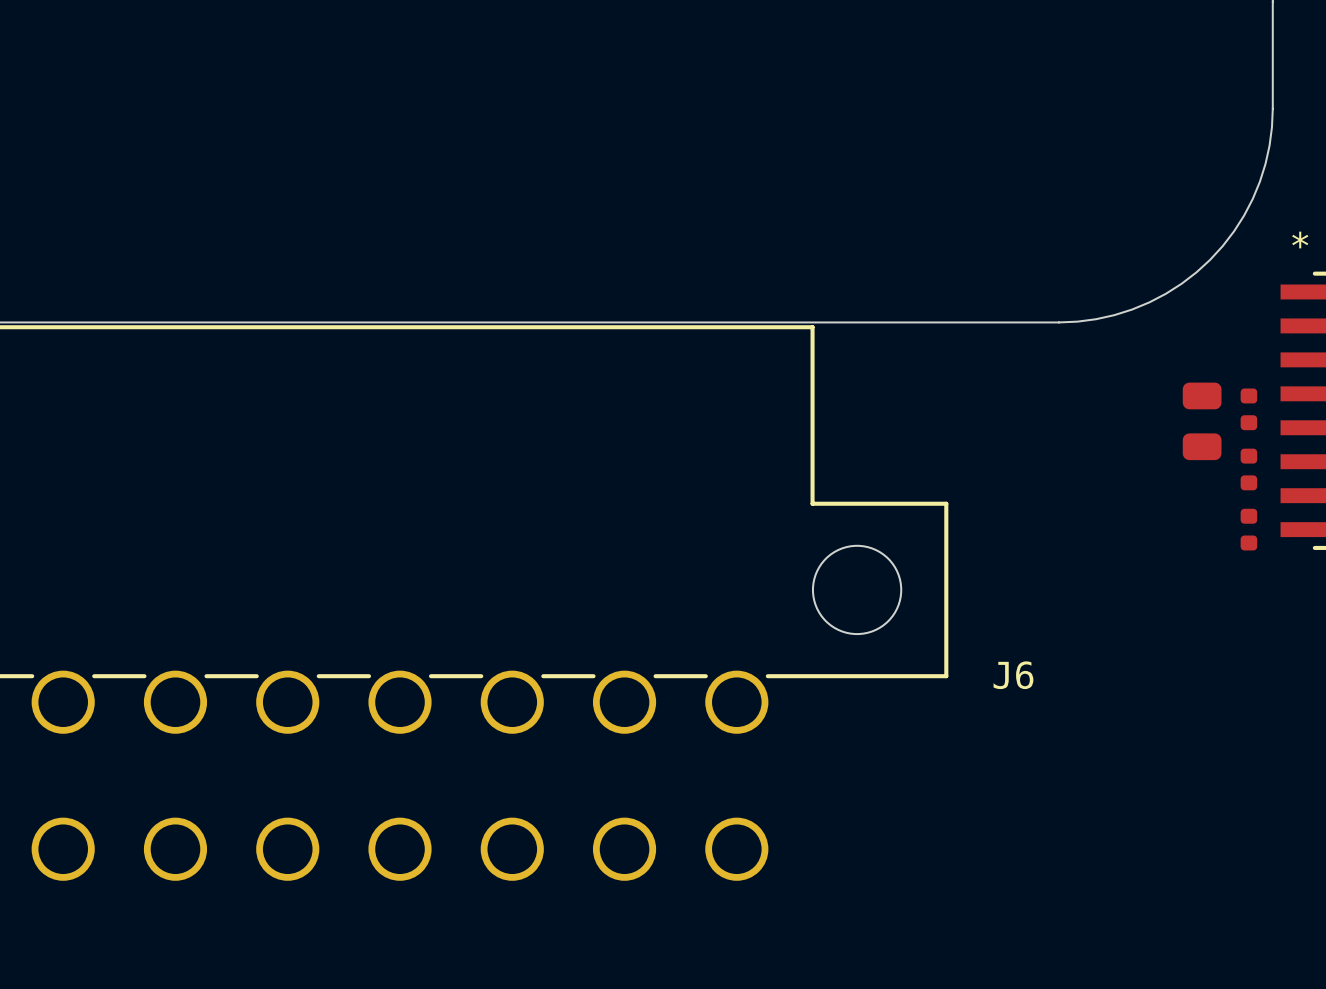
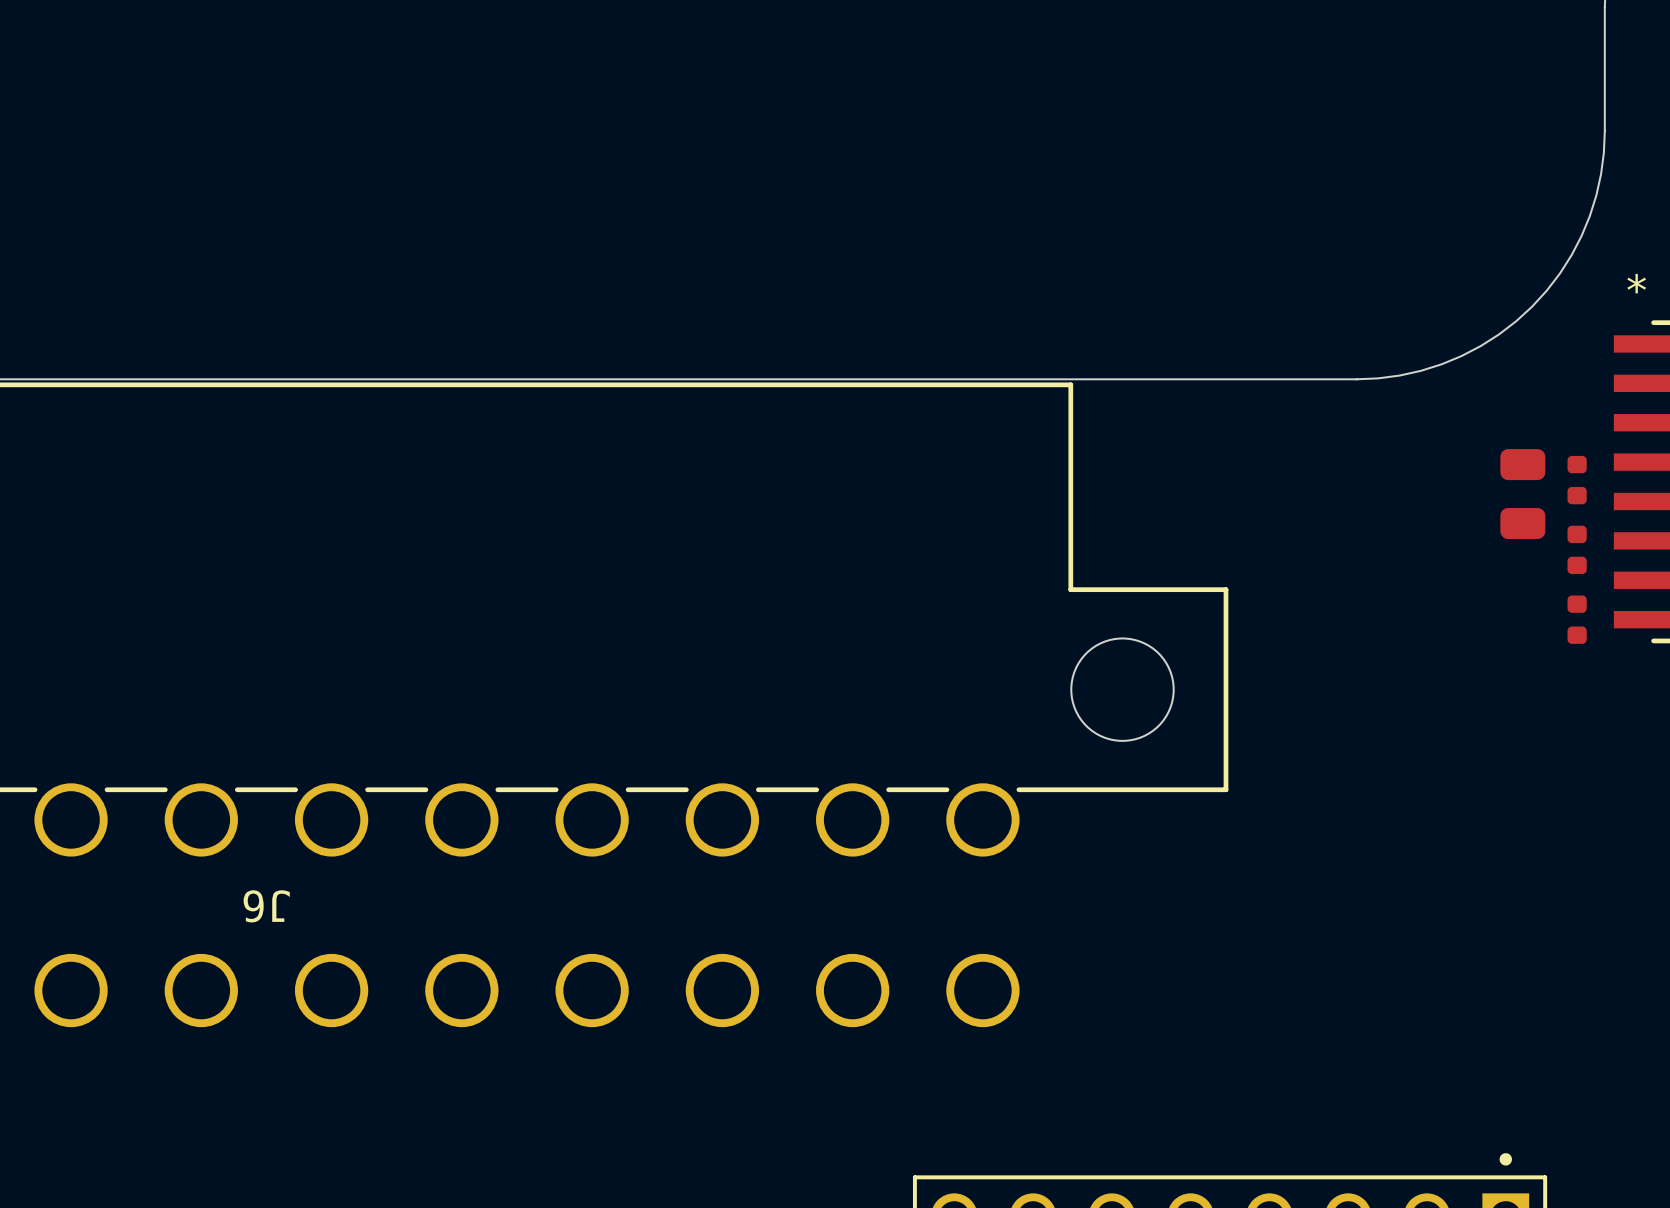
J6 name rotation: 0° (1013, 675) -> 180° (266, 906)
J6 name position: J6 (1013, 675) -> J6 (266, 906)

